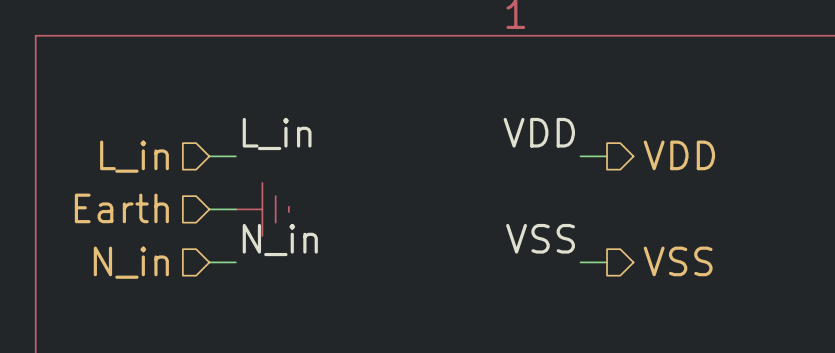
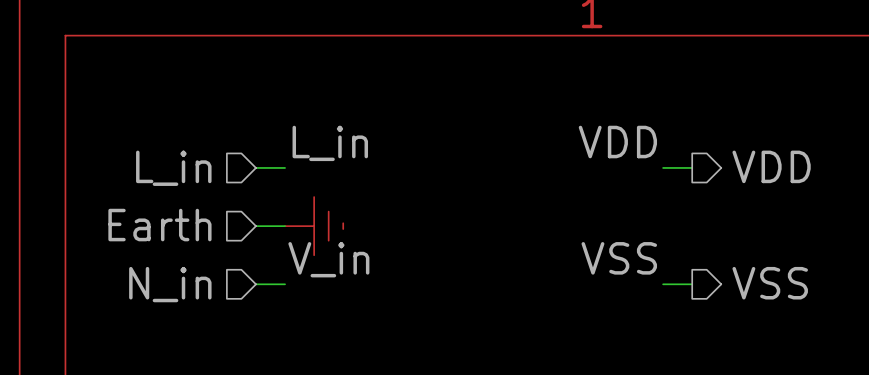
label: N_in (280, 240) -> V_in (328, 259)

